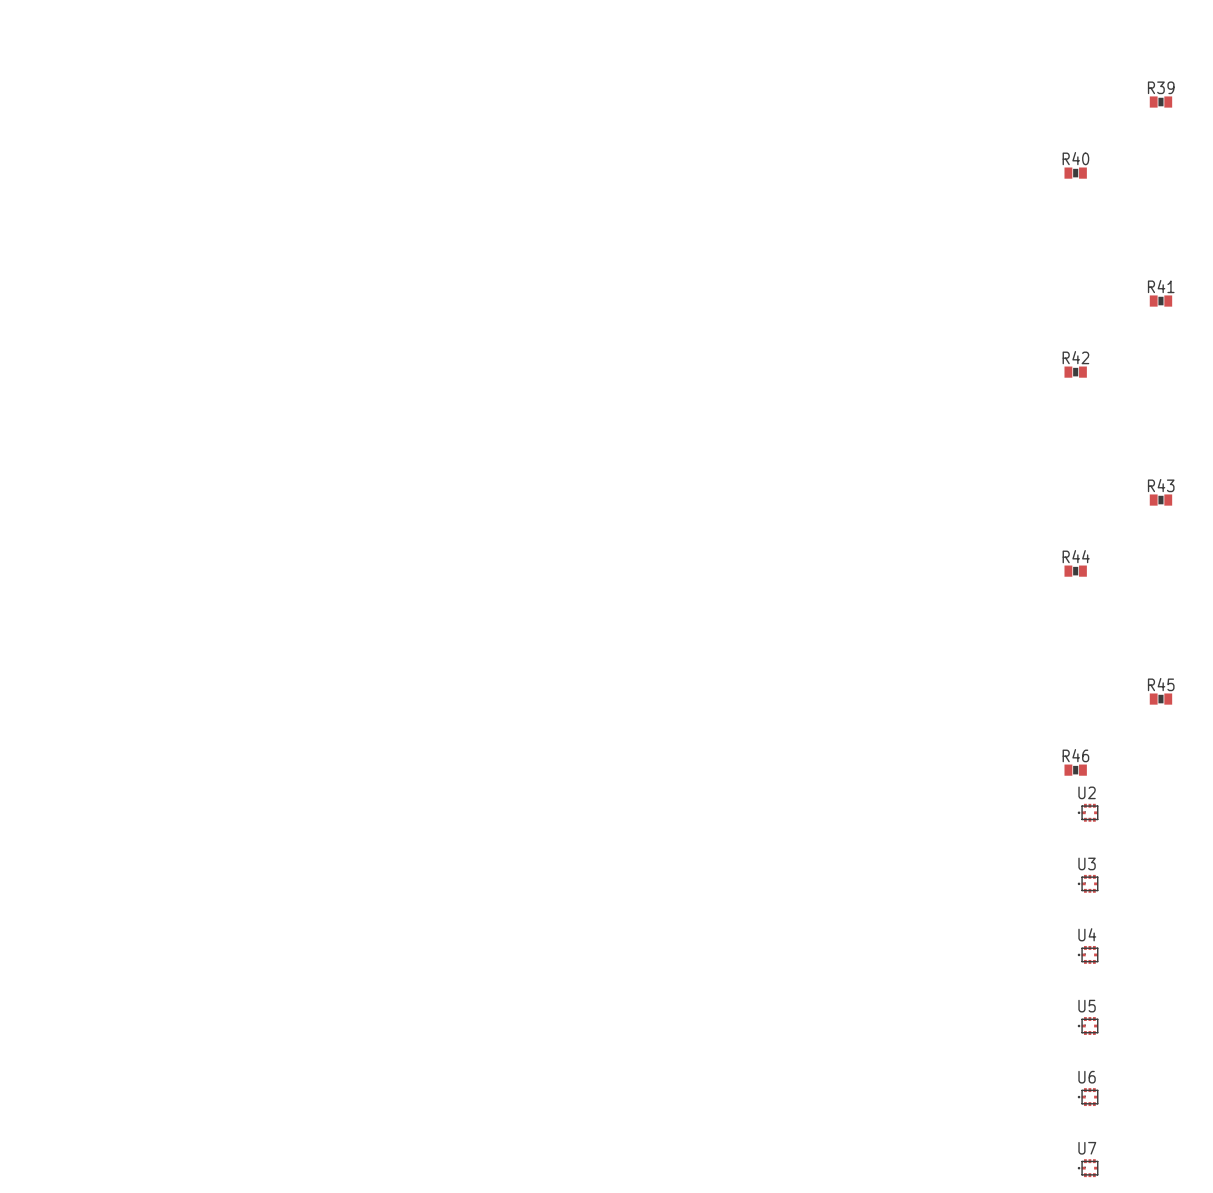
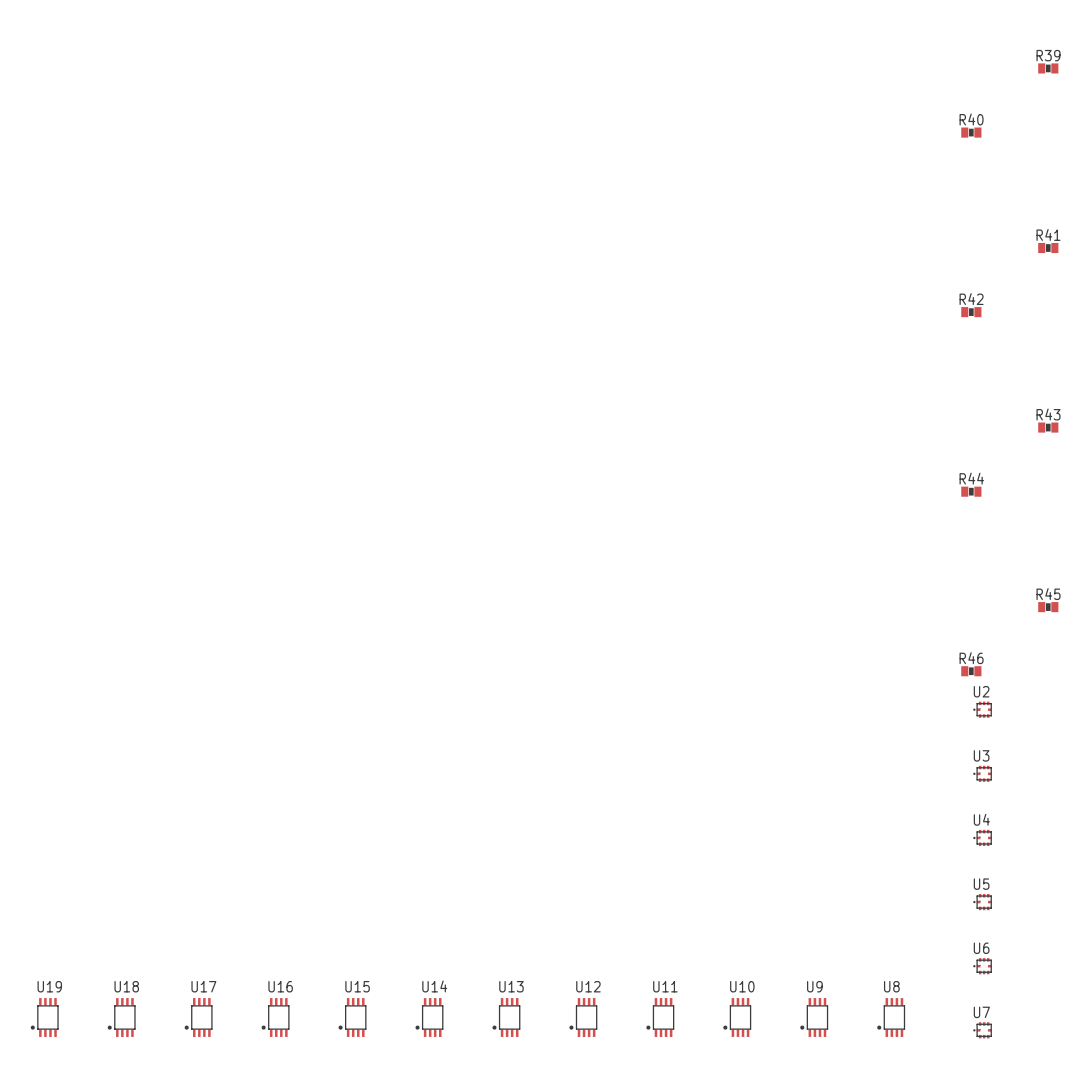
U19: none -> (44, 1017)
U18: none -> (121, 1017)
U17: none -> (198, 1017)
U16: none -> (275, 1017)
U15: none -> (352, 1017)
U14: none -> (429, 1017)
U13: none -> (506, 1017)
U12: none -> (583, 1017)
U11: none -> (660, 1017)
U10: none -> (737, 1017)
U9: none -> (814, 1017)
U8: none -> (891, 1017)

